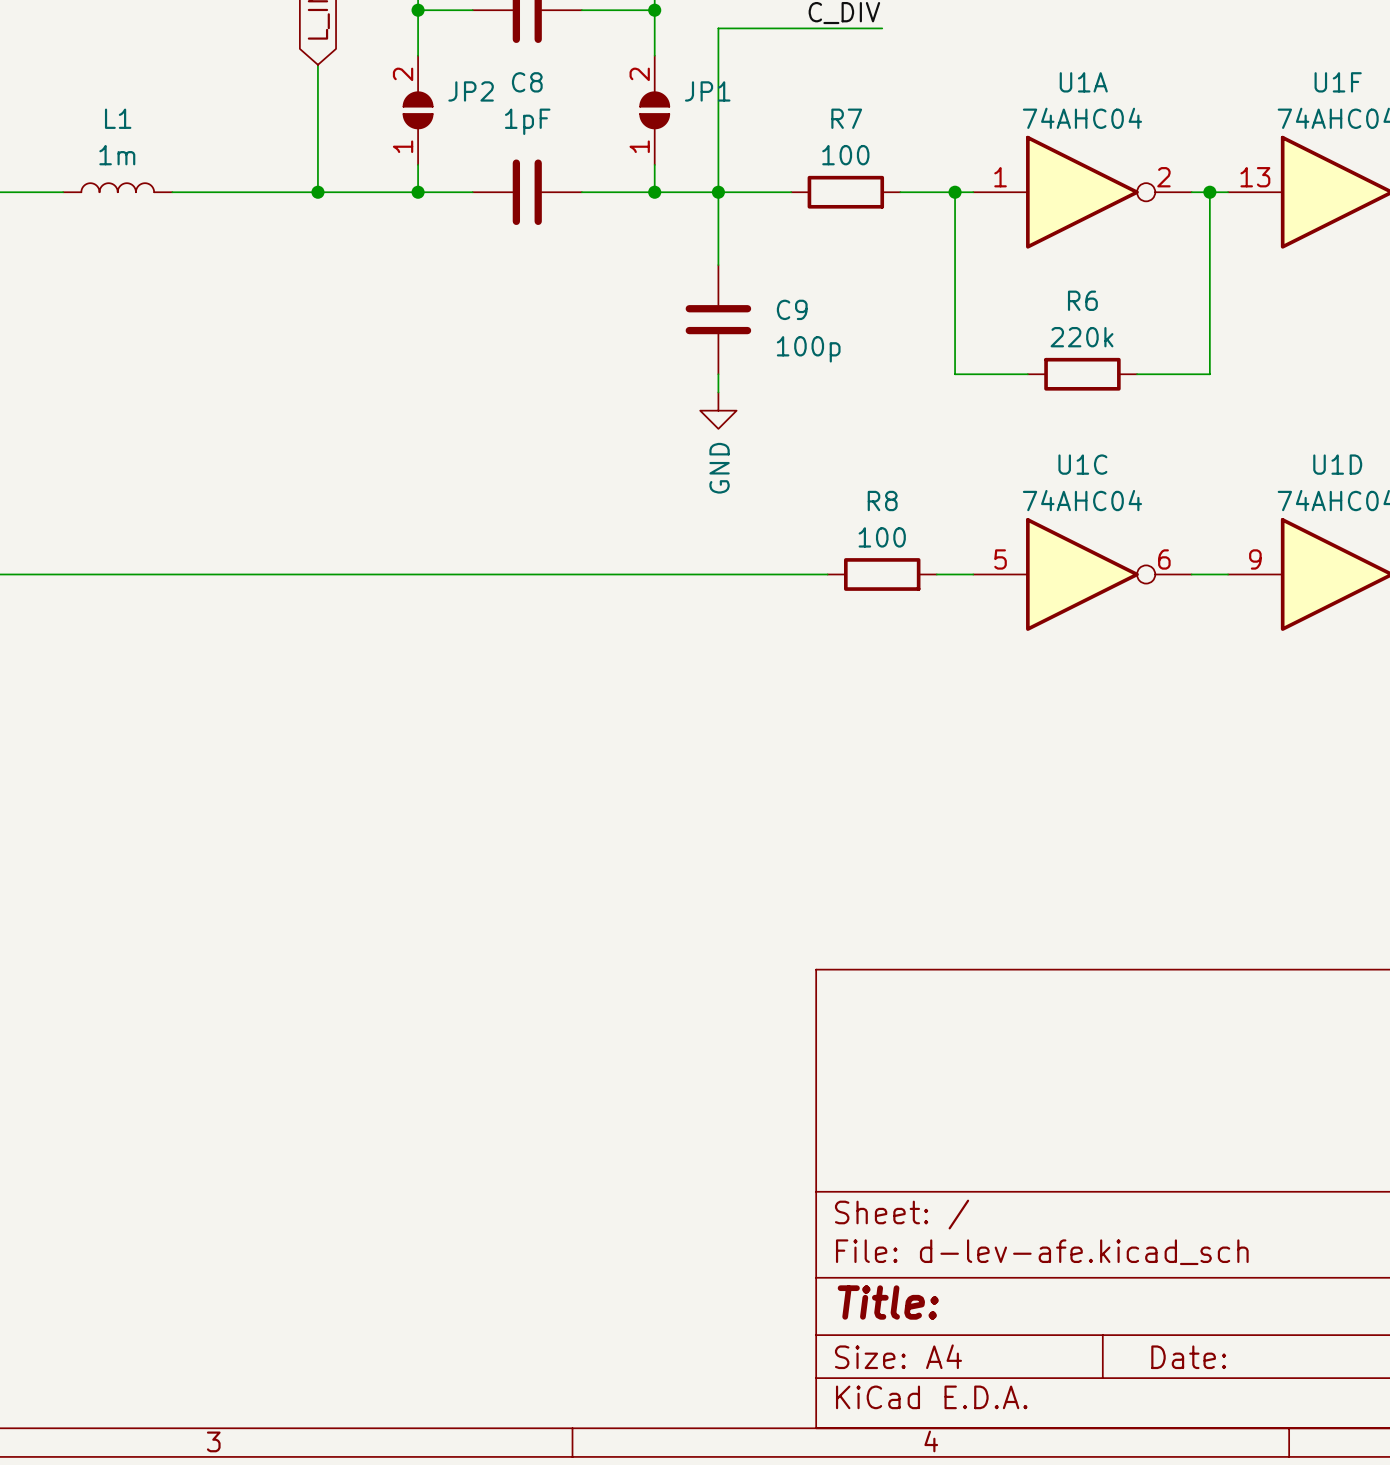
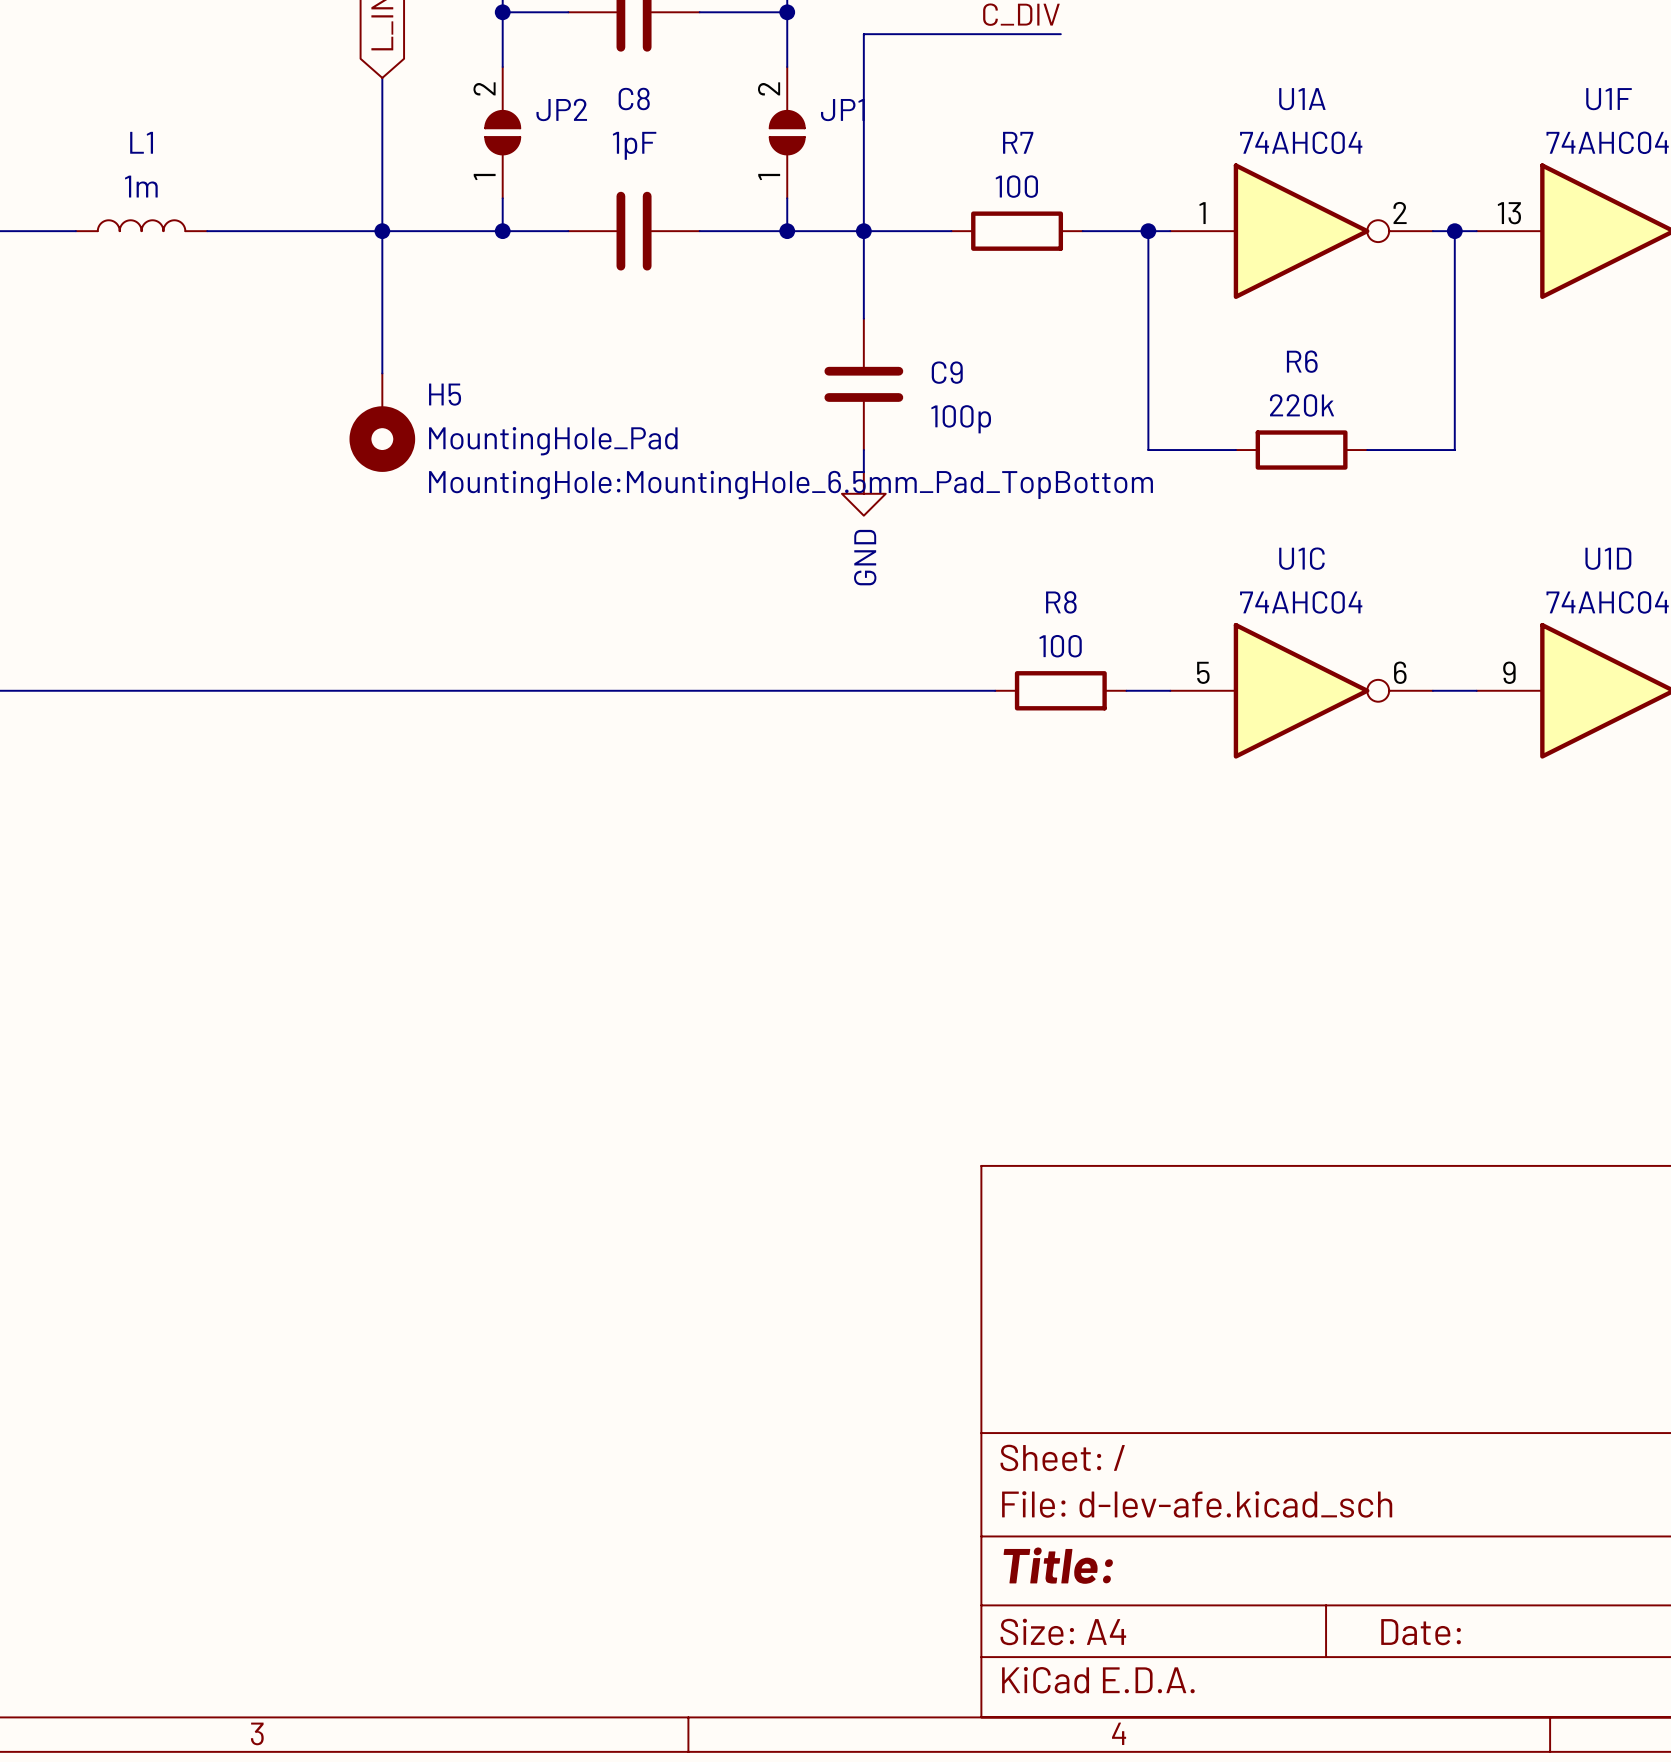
wire: none -> (382, 231) (382, 373)
H5: none -> MountingHole_Pad (382, 422)

